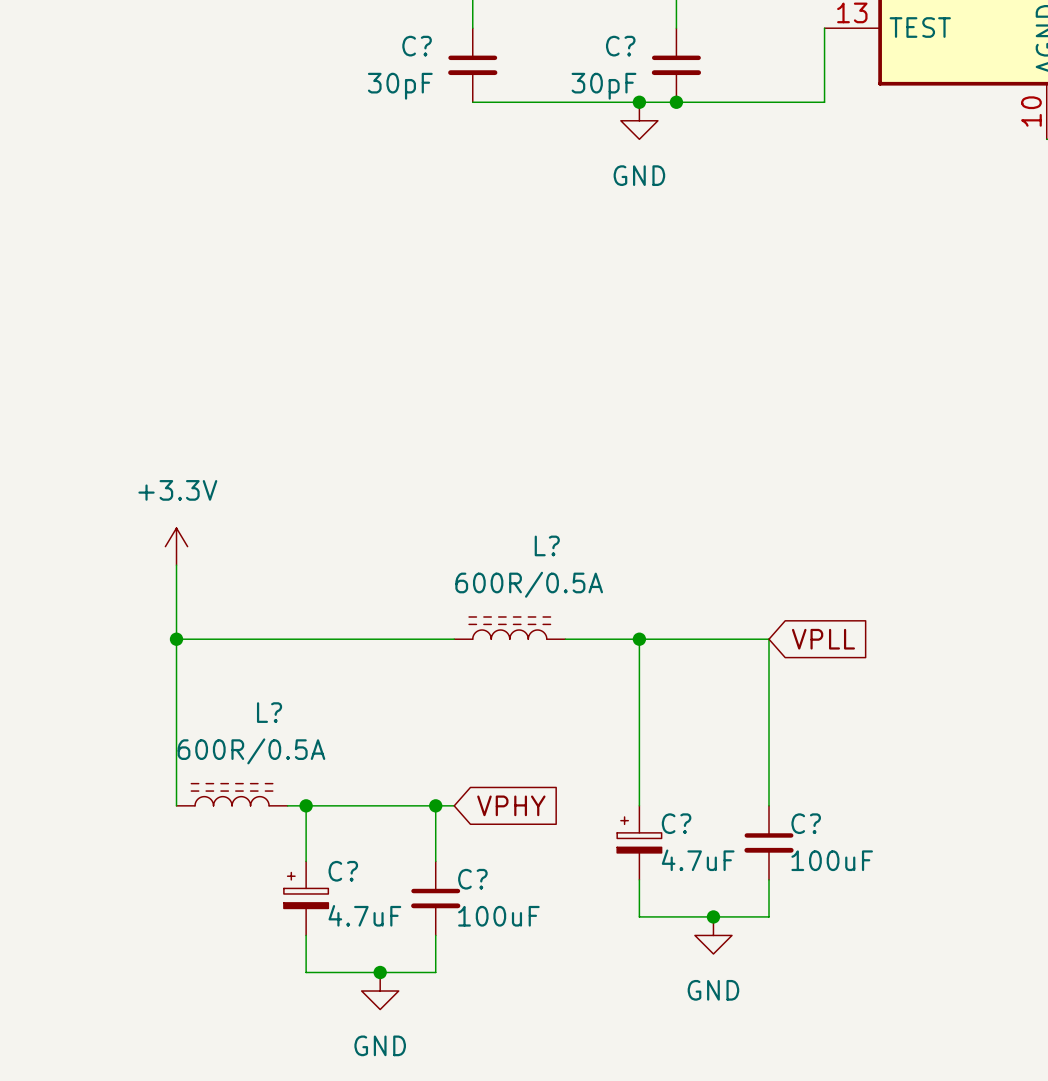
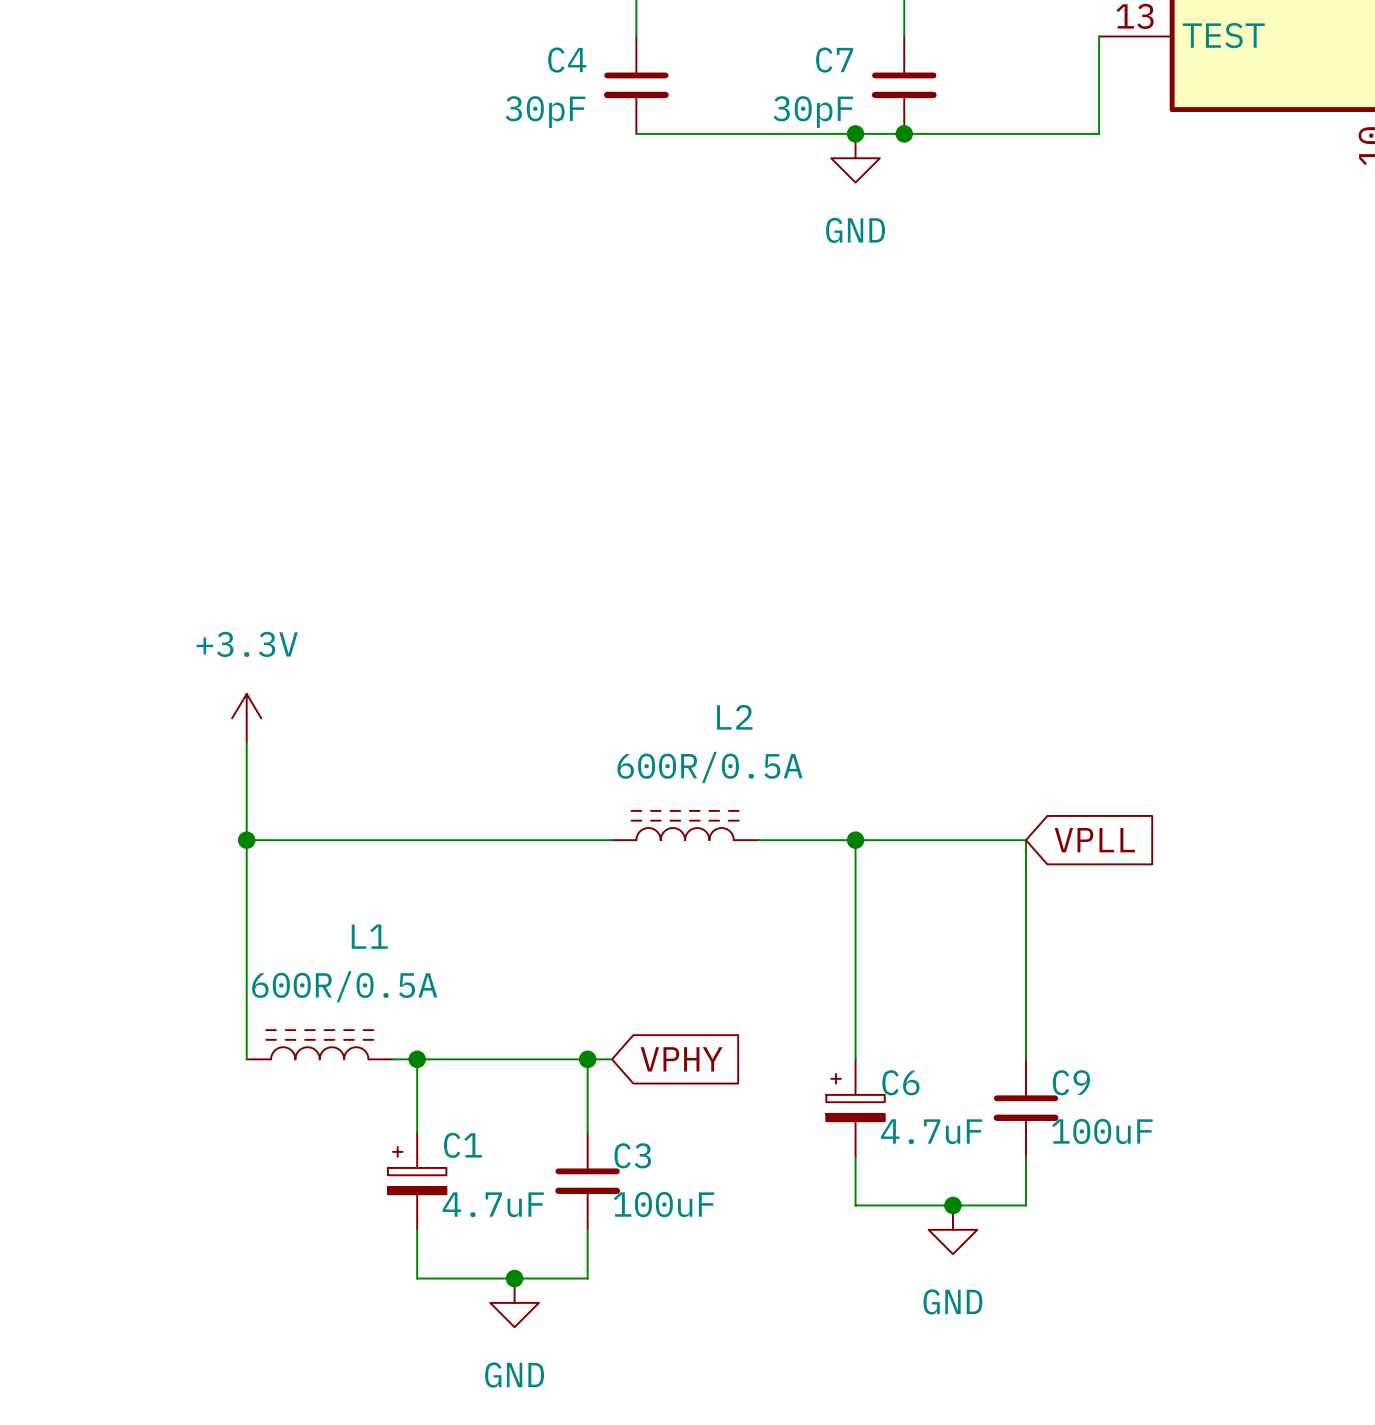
C? name: C? (417, 46) -> C4 (567, 60)
C? name: C? (620, 46) -> C7 (834, 60)
L? name: L? (547, 545) -> L2 (734, 717)
L? name: L? (269, 712) -> L1 (369, 936)
C? name: C? (676, 823) -> C6 (900, 1082)
C? name: C? (806, 823) -> C9 (1071, 1082)
C? name: C? (343, 871) -> C1 (462, 1145)
C? name: C? (472, 879) -> C3 (632, 1155)

